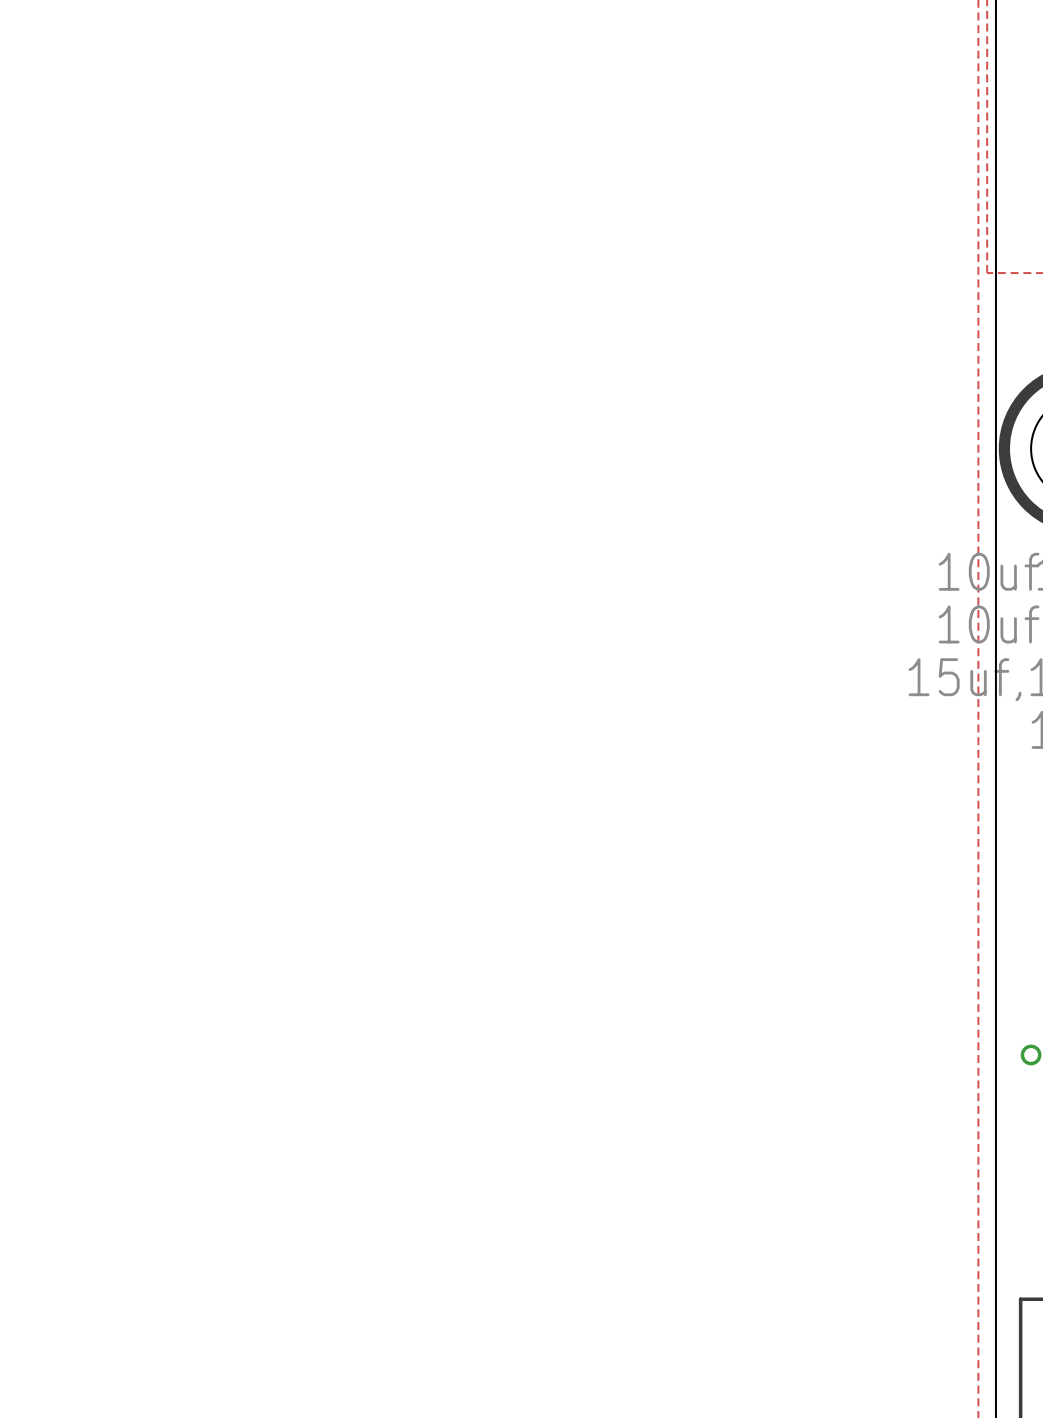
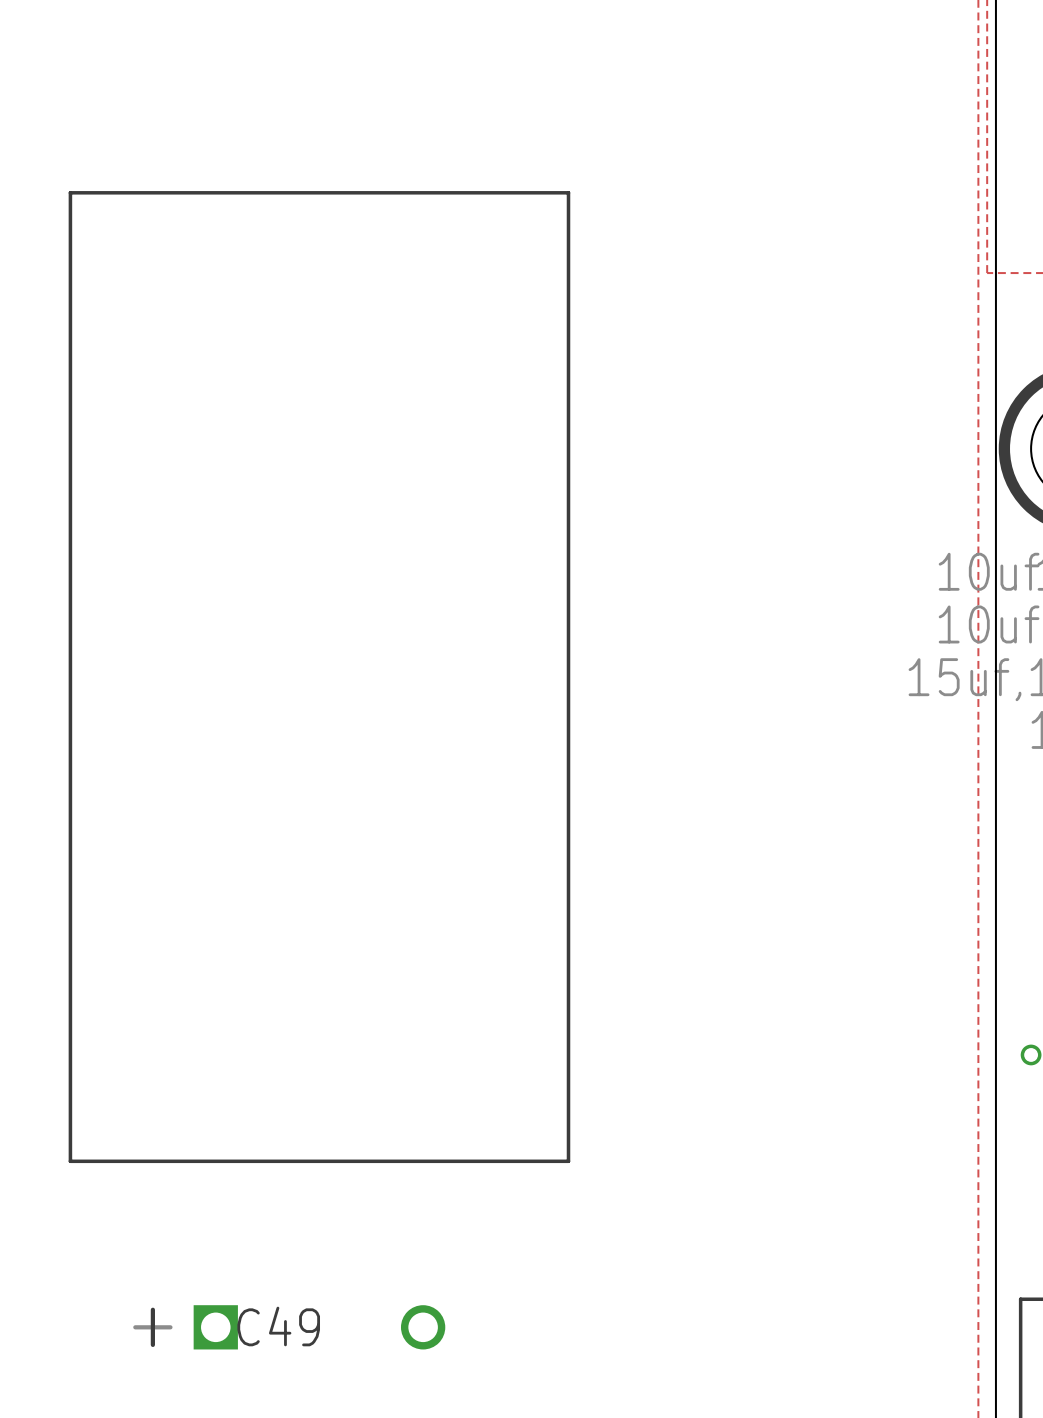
C49: none -> (319, 770)

